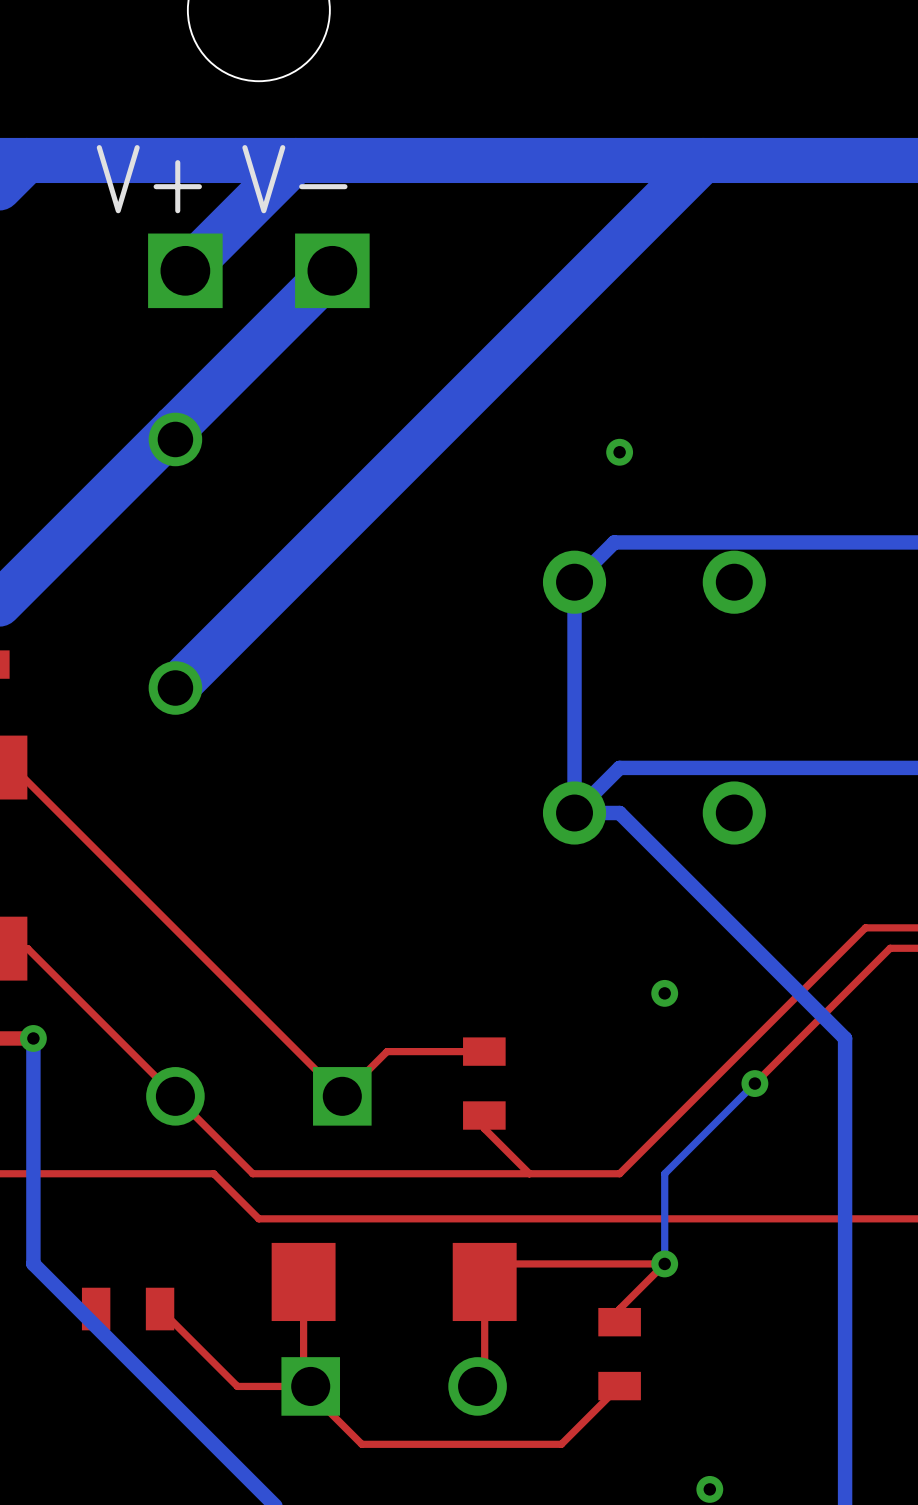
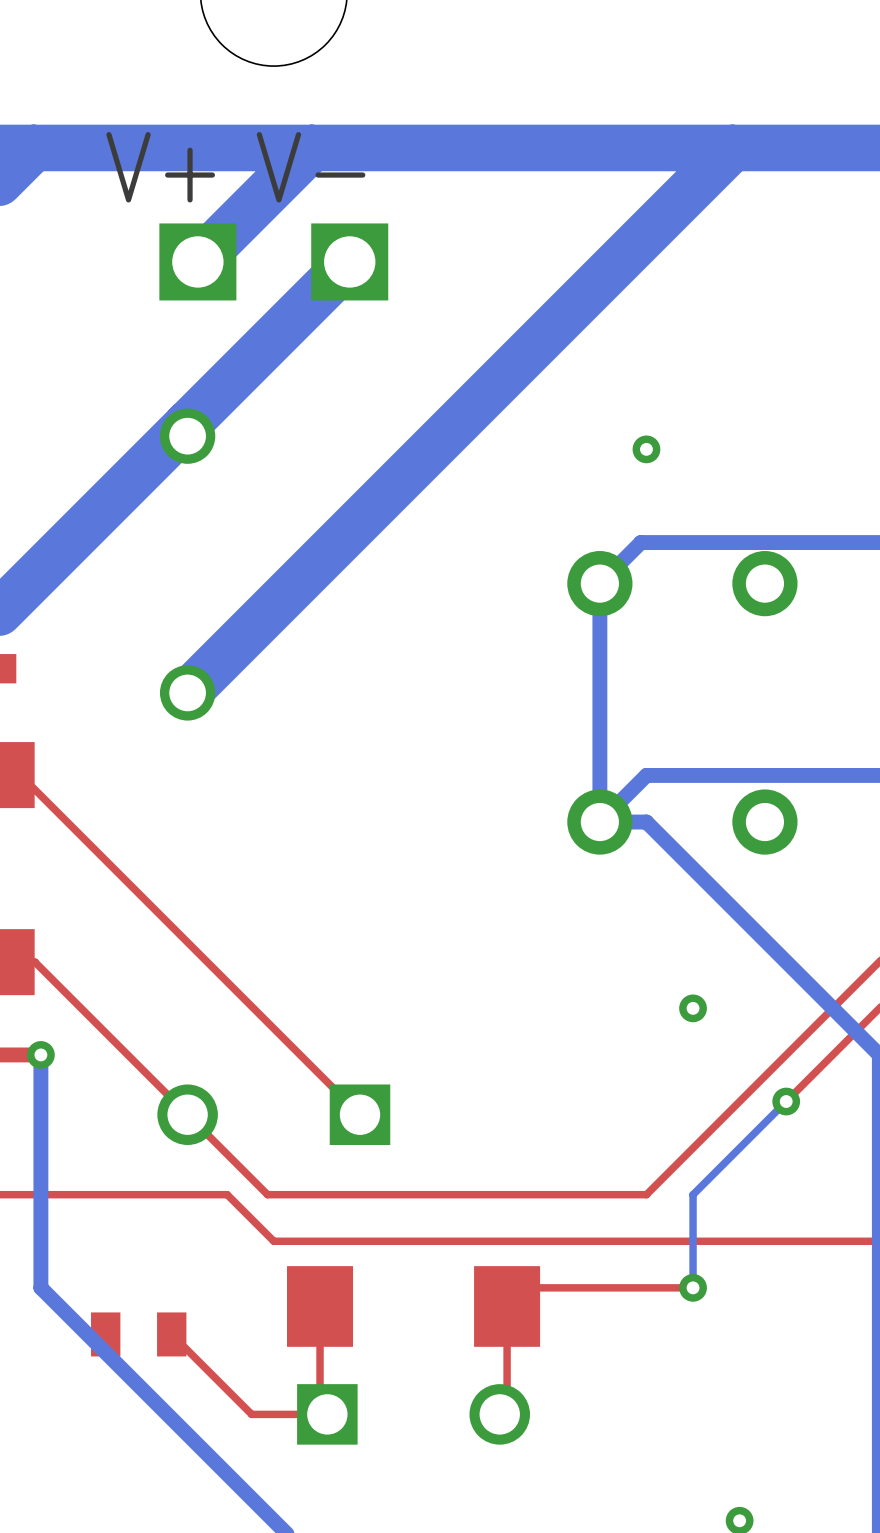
top track: (484, 1051) (387, 1051) (342, 1096) -> none
part: (484, 1083) -> none
top track: (484, 1115) (484, 1128) (529, 1173) -> none
top track: (664, 1263) (619, 1309) (619, 1322) -> none
part: (619, 1354) -> none
top track: (619, 1386) (561, 1444) (361, 1444) (303, 1386) -> none

